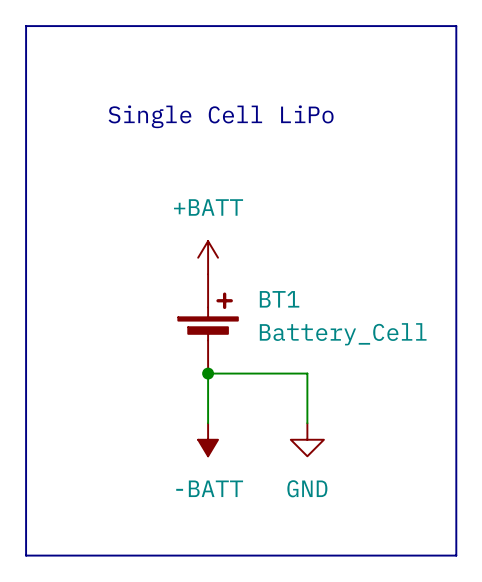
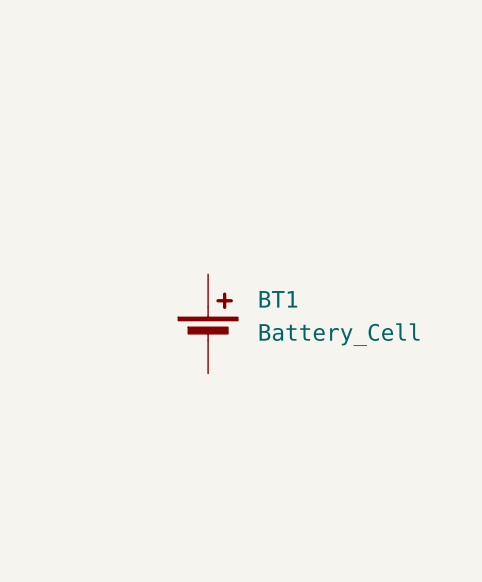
line: (26, 26) (456, 26) (456, 555) (26, 555) (26, 26) -> none
text: Single Cell LiPo (221, 116) -> none
power symbol: +BATT (208, 257) -> none
junction: (208, 373) -> none
wire: (208, 423) (208, 373) (307, 373) (307, 423) -> none
power symbol: -BATT (208, 439) -> none
power symbol: GND (307, 439) -> none

